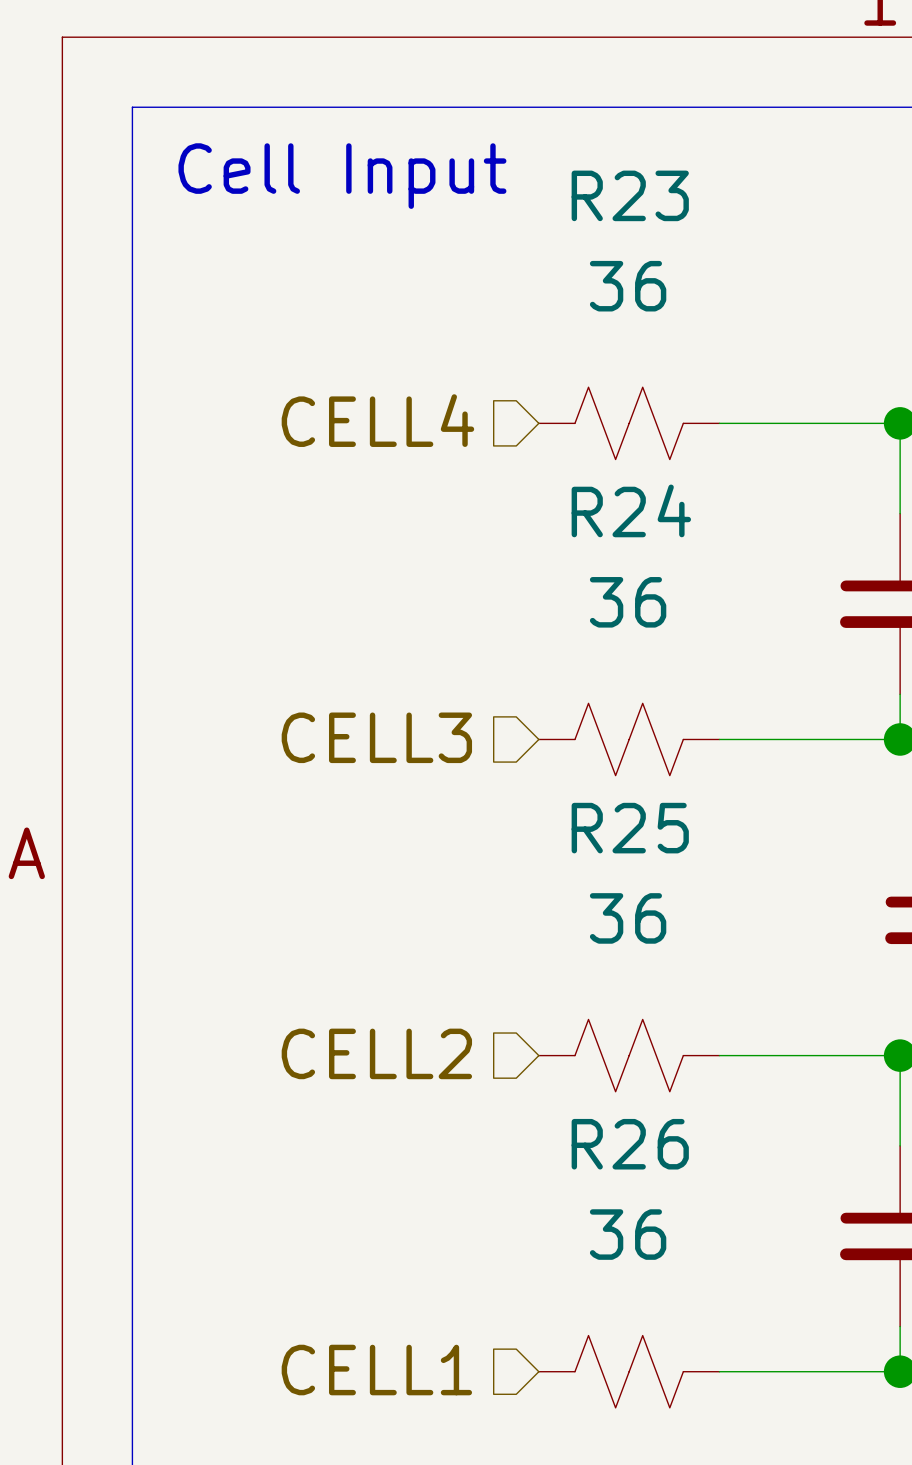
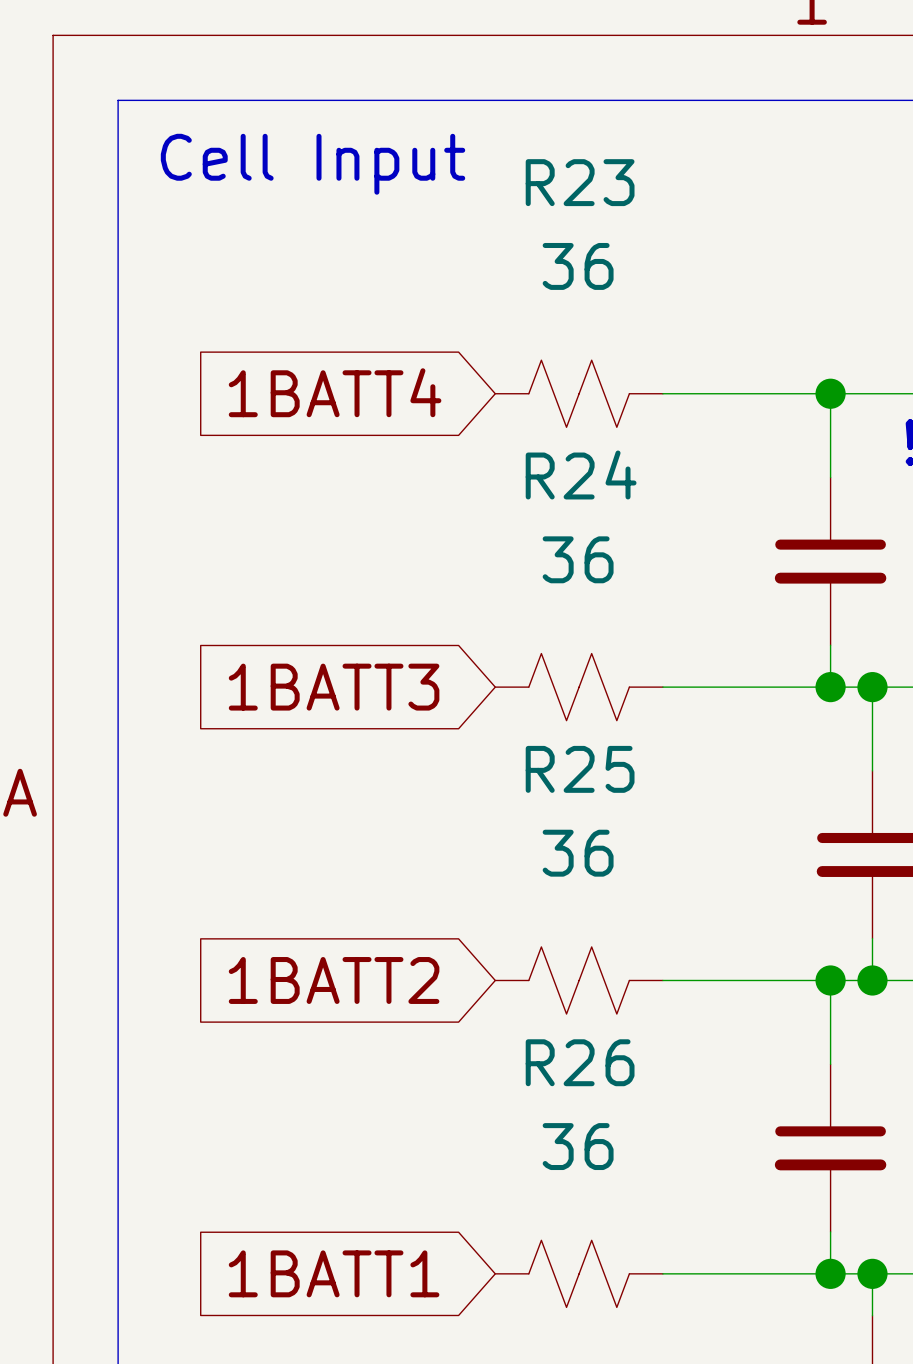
hierarchical label: CELL4 (377, 420) -> none
global label: none -> 1BATT4 (335, 392)
hierarchical label: CELL3 (376, 737) -> none
global label: none -> 1BATT3 (334, 687)
hierarchical label: CELL2 (376, 1053) -> none
global label: none -> 1BATT2 (334, 980)
hierarchical label: CELL1 (376, 1370) -> none
global label: none -> 1BATT1 (334, 1273)

